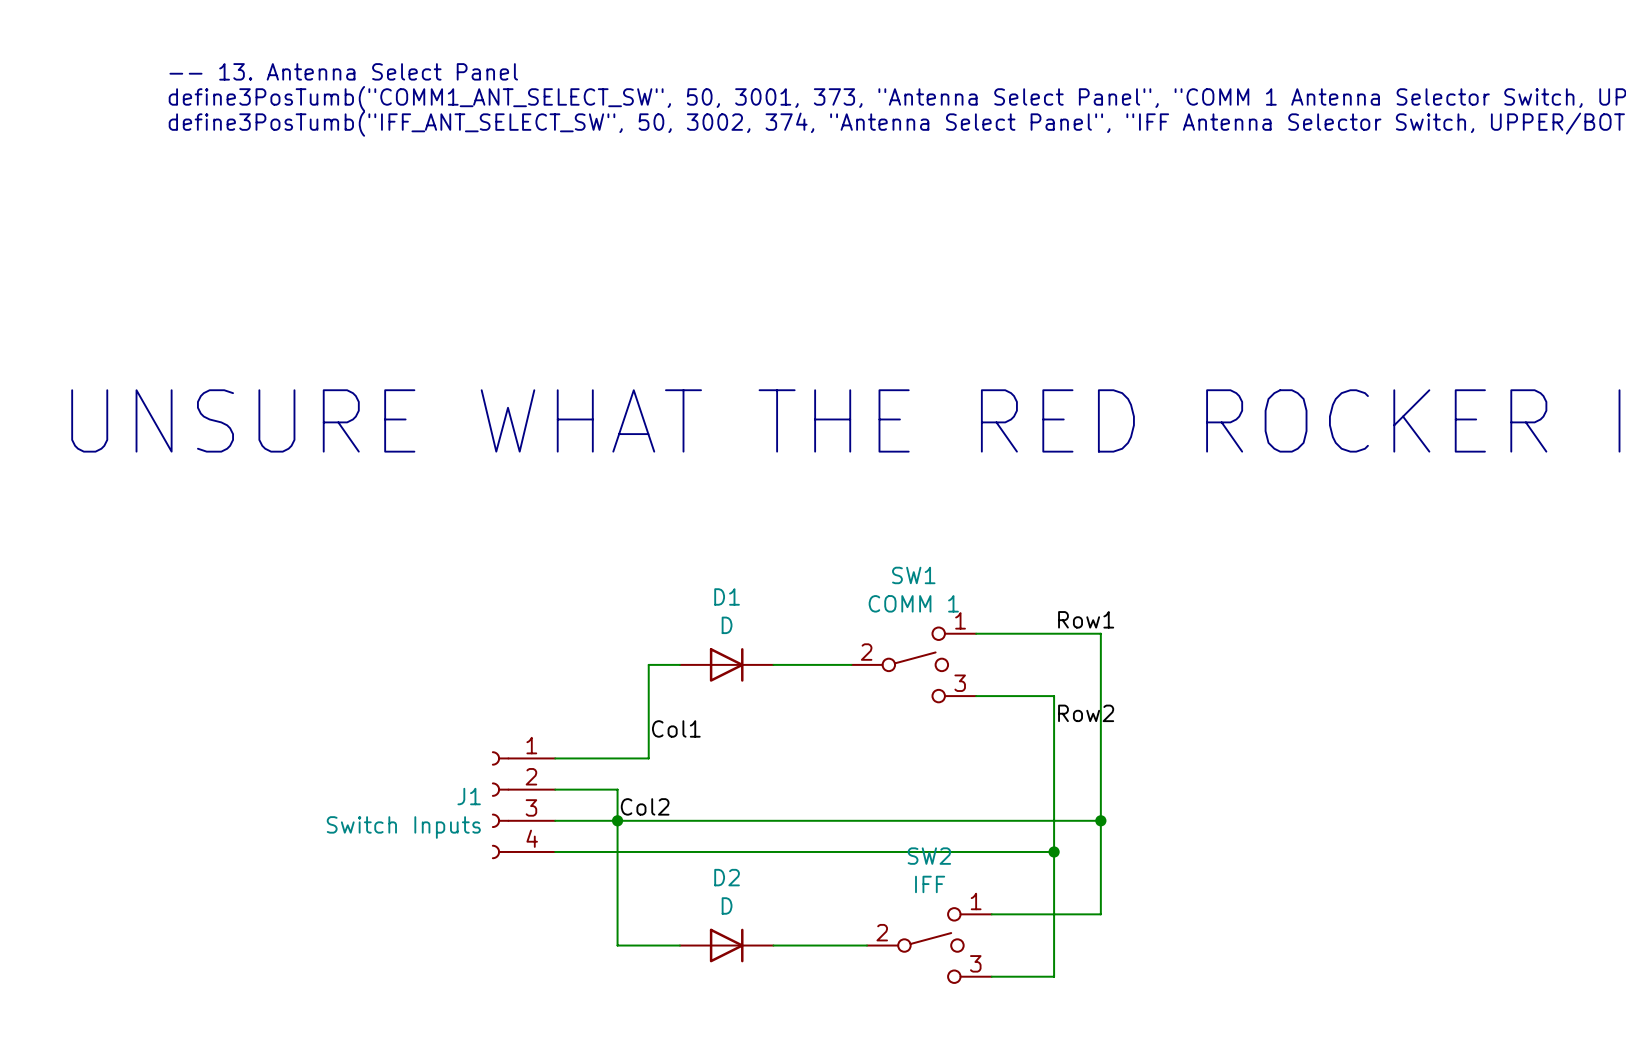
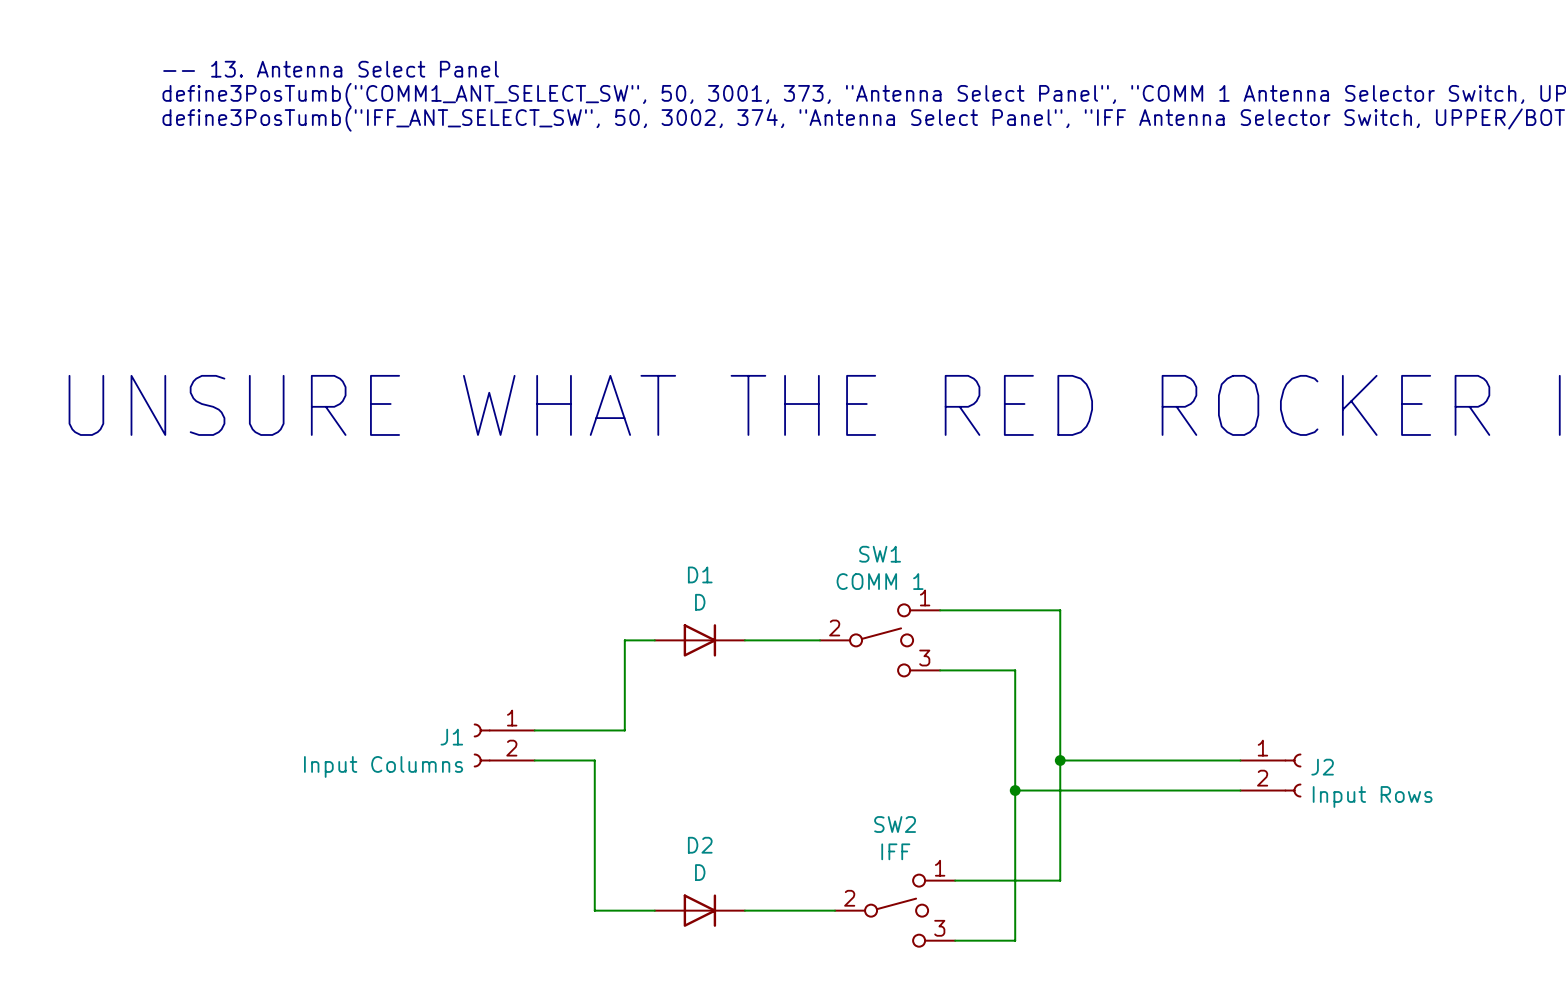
label: Row1 (1086, 619) -> none
label: Row2 (1086, 713) -> none
label: Col1 (676, 728) -> none
J1 symbol: [491, 751, 556, 860] -> [473, 723, 535, 768]
wire: none -> (1060, 760) (1240, 760)
junction: none -> (1060, 760)
J2: none -> Input Rows (1270, 775)
label: Col2 (645, 806) -> none
wire: (555, 820) (1054, 820) -> none
junction: (617, 820) -> none
junction: none -> (1015, 790)
wire: none -> (1060, 790) (1240, 790)
junction: (1100, 820) -> none
J1 value: Switch Inputs (403, 827) -> Input Columns (383, 766)
wire: (555, 851) (1054, 851) -> none
junction: (1054, 851) -> none

